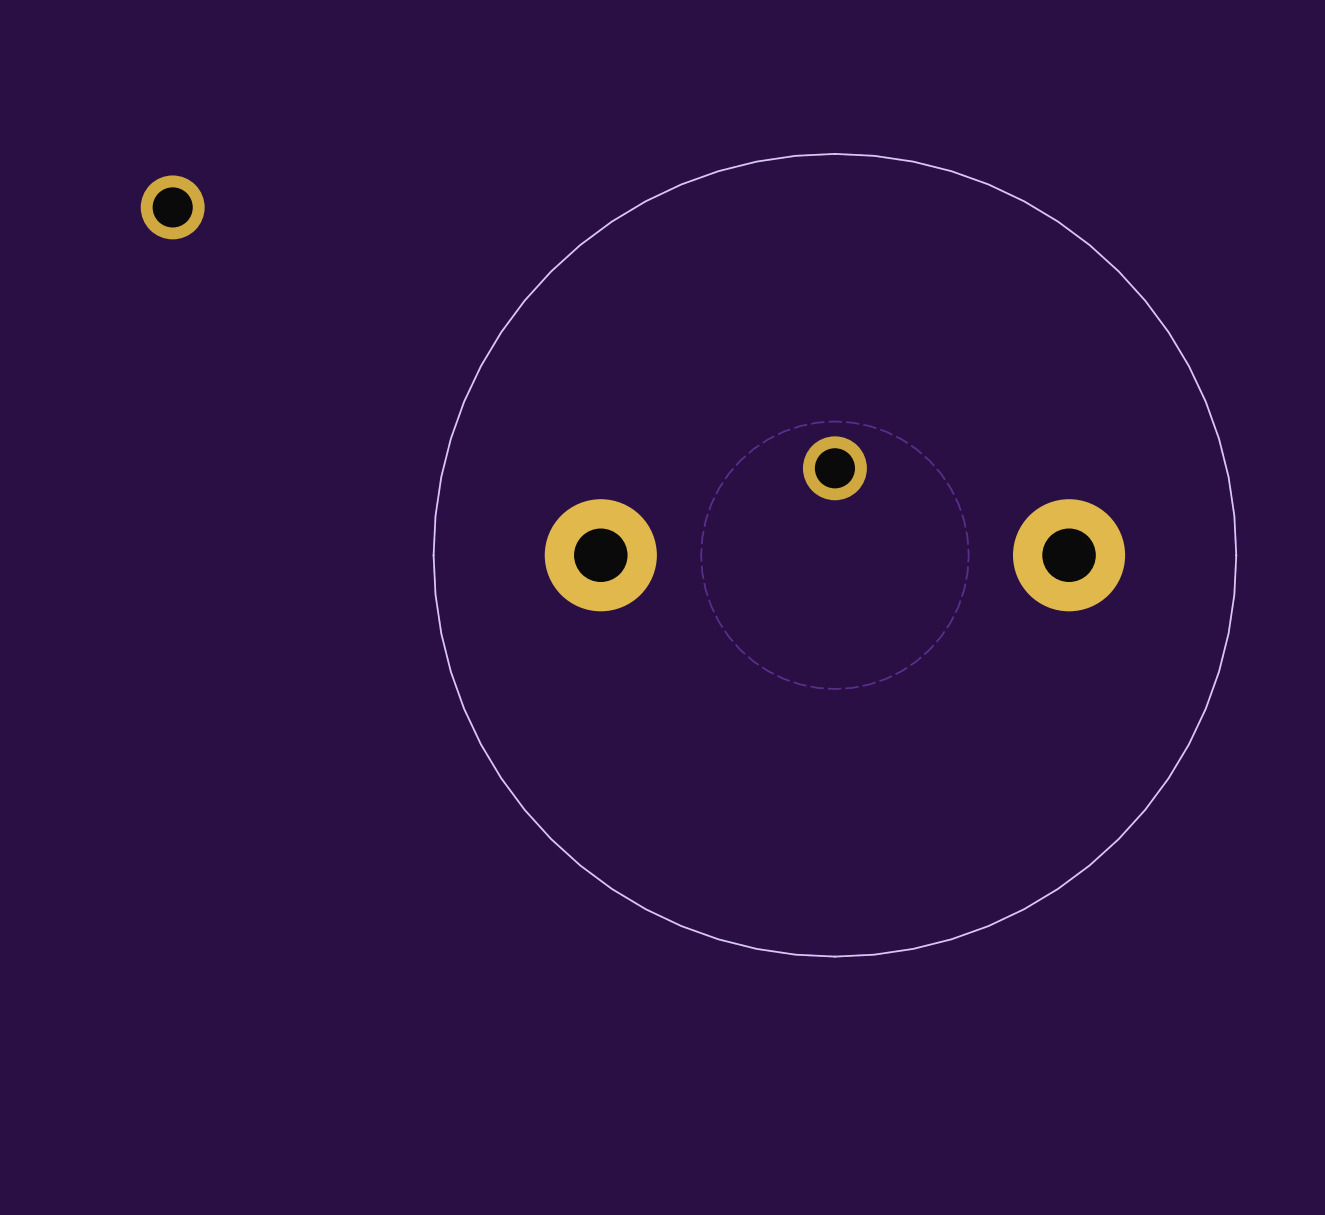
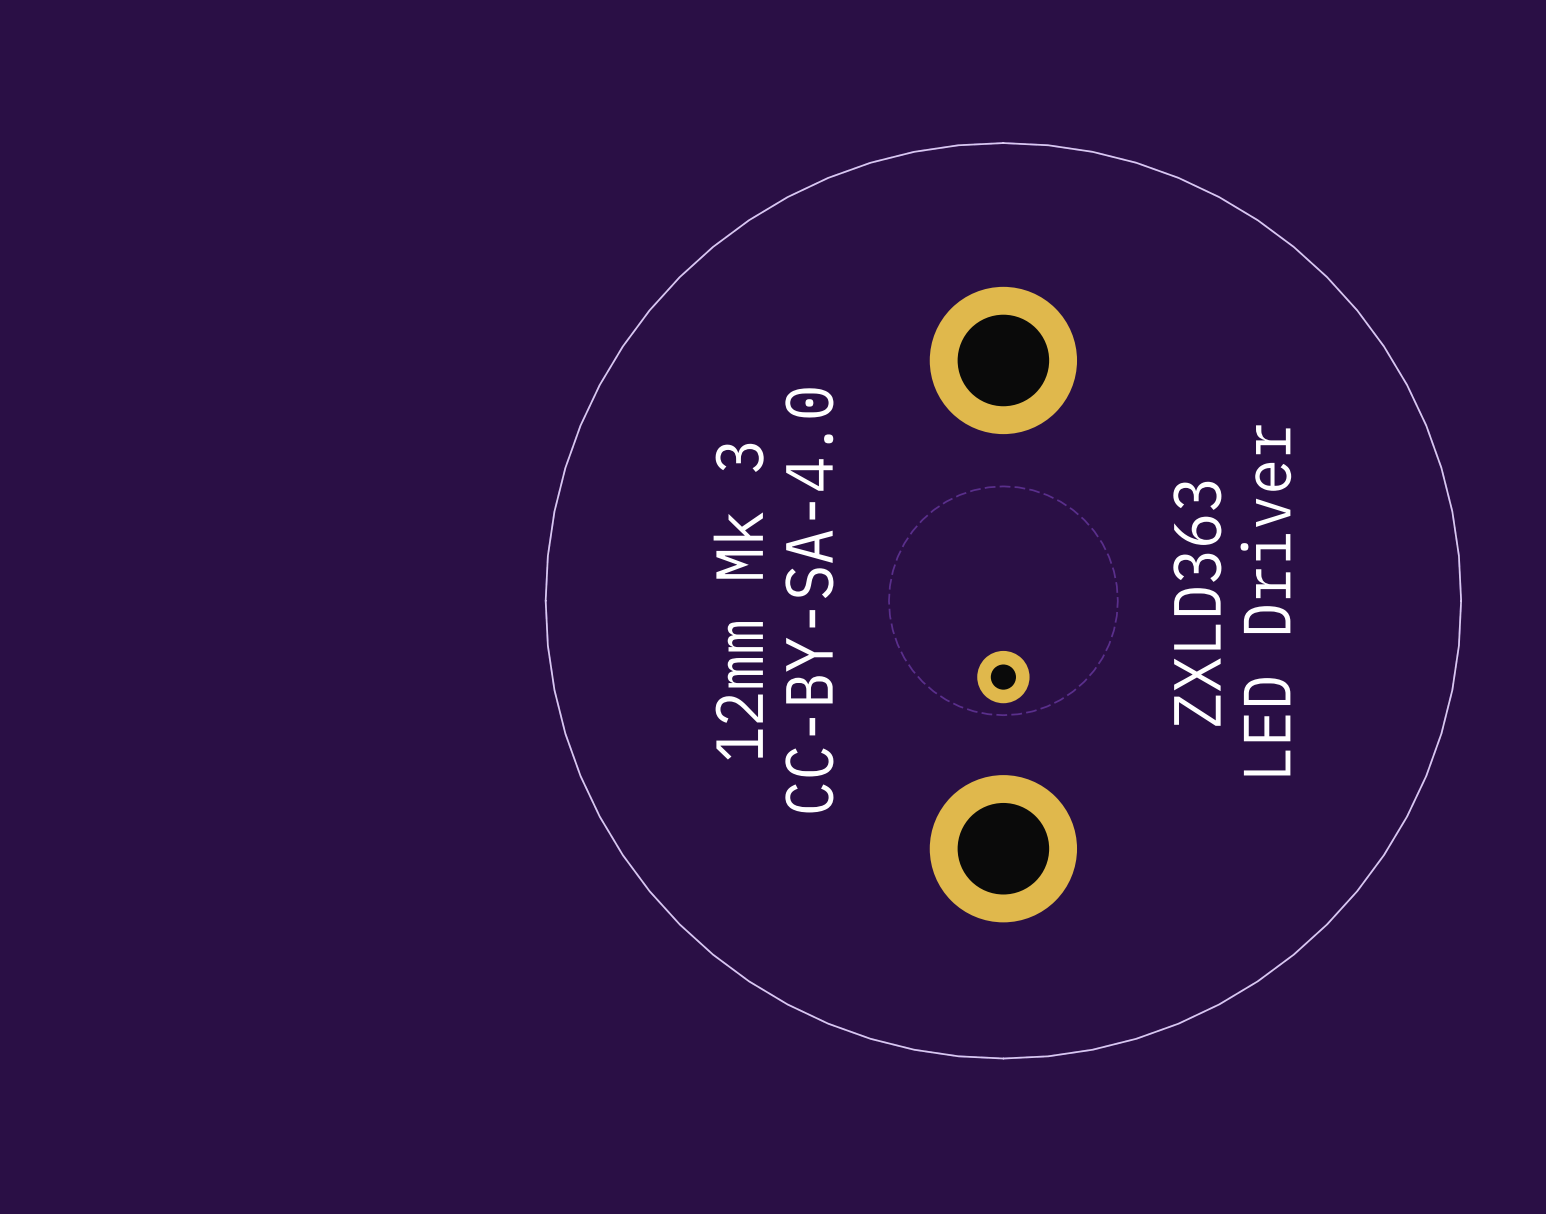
via: (172, 207) -> none
part: none -> (1003, 360)
zone outline: (834, 421) (852, 422) (886, 431) (901, 439) (929, 460) (950, 488) (958, 504) (967, 537) (968, 555) (967, 572) (958, 606) (950, 622) (929, 649) (901, 671) (886, 678) (852, 687) (834, 689) (817, 687) (783, 678) (768, 671) (740, 649) (719, 622) (711, 606) (702, 572) (701, 555) (702, 537) (711, 504) (719, 488) (740, 460) (768, 439) (783, 431) (817, 422) (834, 421) -> (1003, 486) (1033, 490) (1047, 495) (1073, 510) (1084, 519) (1094, 531) (1109, 557) (1113, 571) (1117, 600) (1113, 630) (1109, 644) (1094, 670) (1084, 681) (1073, 691) (1047, 706) (1033, 711) (1003, 715) (973, 711) (959, 706) (933, 691) (922, 681) (912, 670) (897, 644) (892, 630) (888, 600) (892, 571) (897, 557) (912, 531) (922, 519) (933, 510) (959, 495) (973, 490) (1003, 486)
via: (834, 468) -> none
text: none -> CC-BY-SA-4.0 (809, 600)
text: none -> LED Driver (1265, 600)
part: (600, 555) -> none
part: (1069, 555) -> none
text: none -> 12mm Mk 3 (738, 601)
text: none -> ZXLD363 (1197, 603)
part: none -> (1003, 677)
part: none -> (1003, 848)

